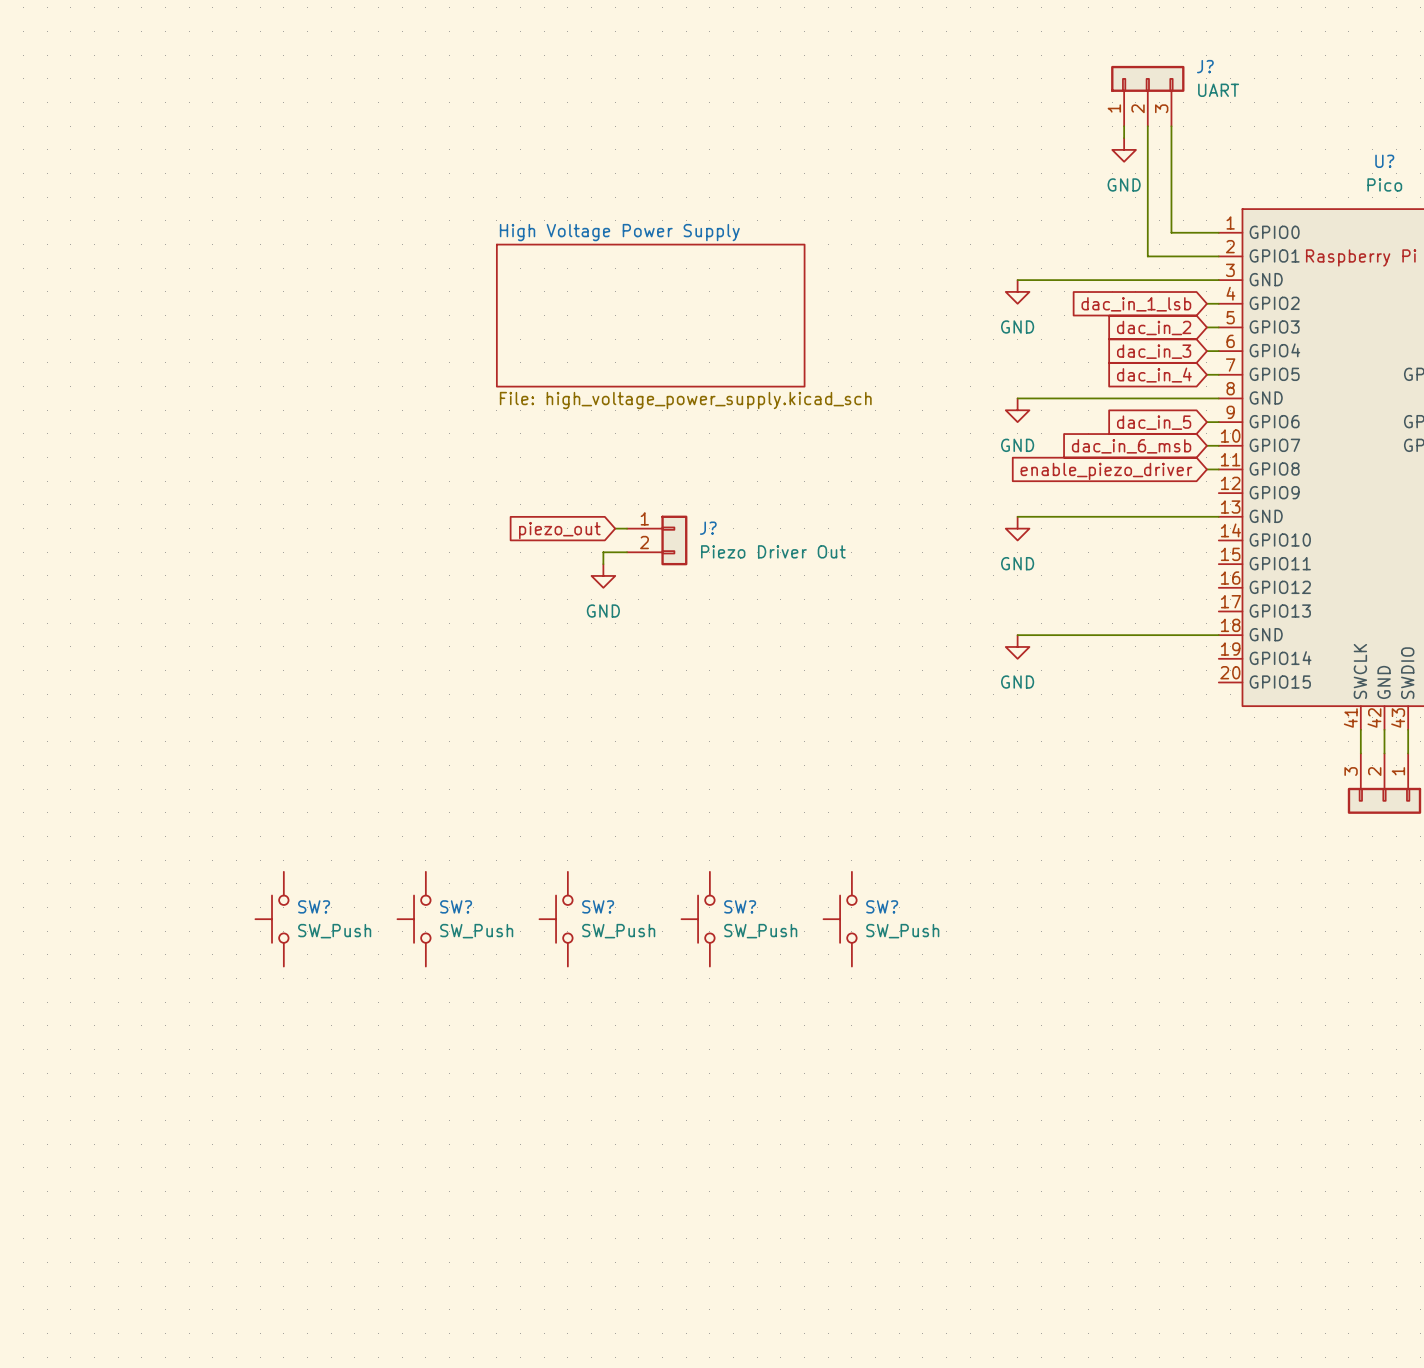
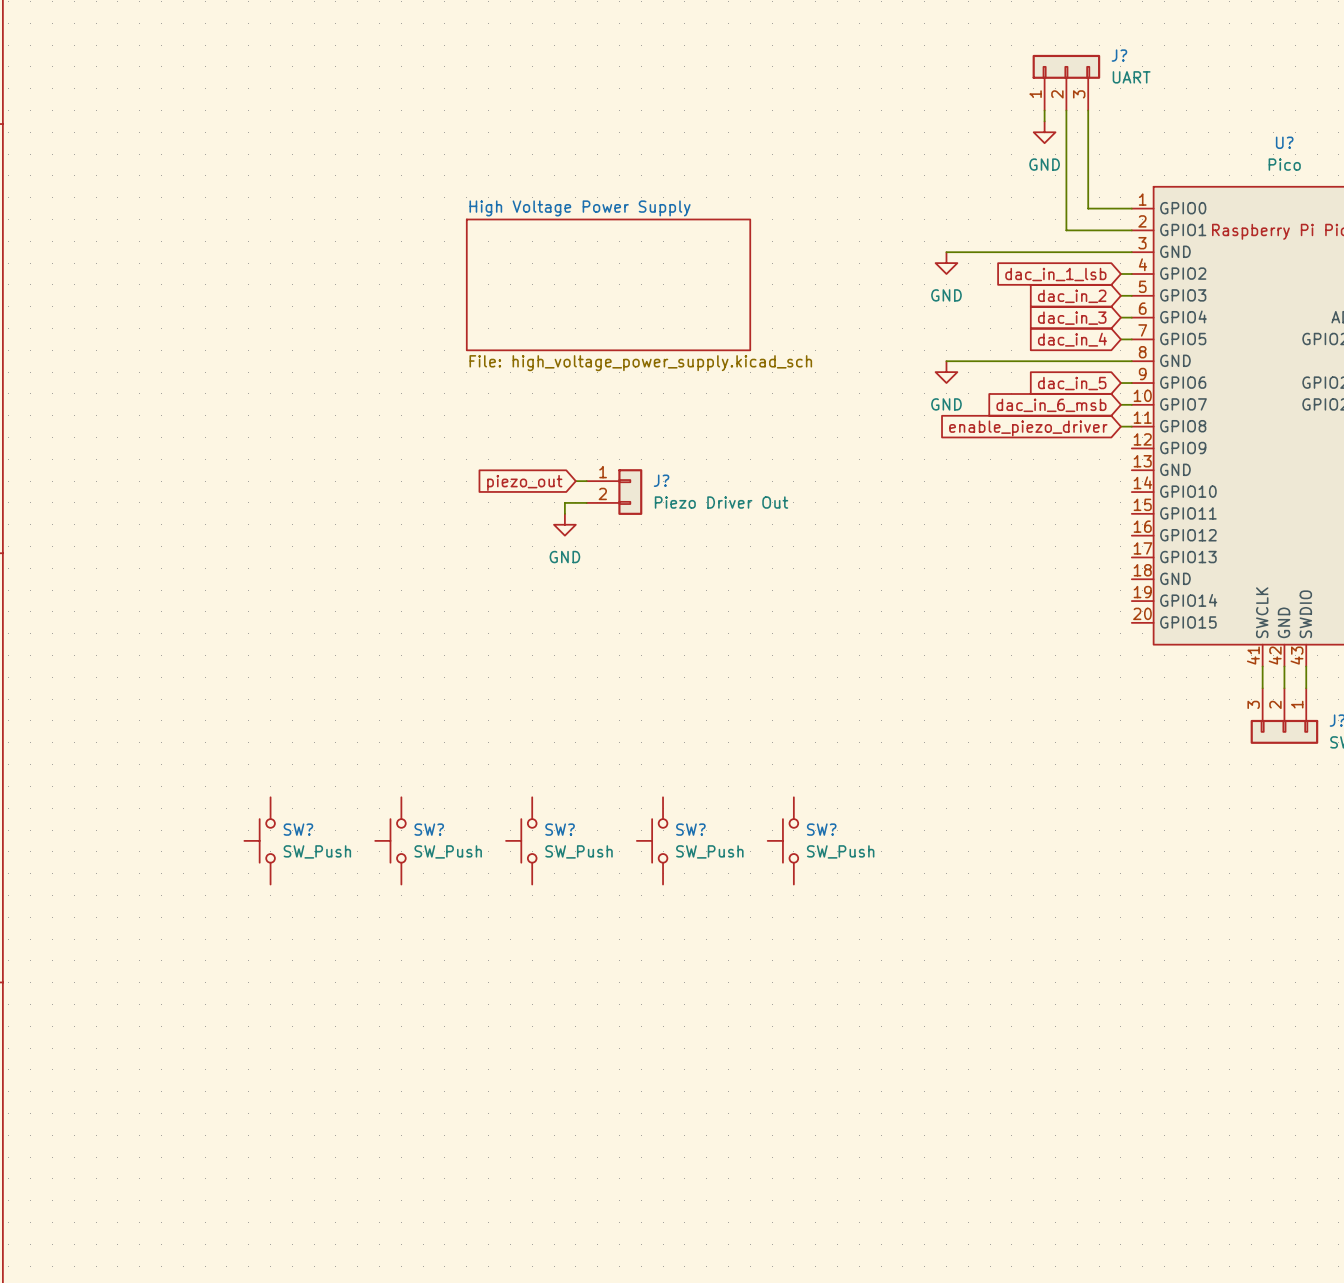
wire: (1017, 516) (1218, 516) -> none
power symbol: GND (1017, 528) -> none
wire: (1017, 635) (1218, 635) -> none
power symbol: GND (1017, 646) -> none

